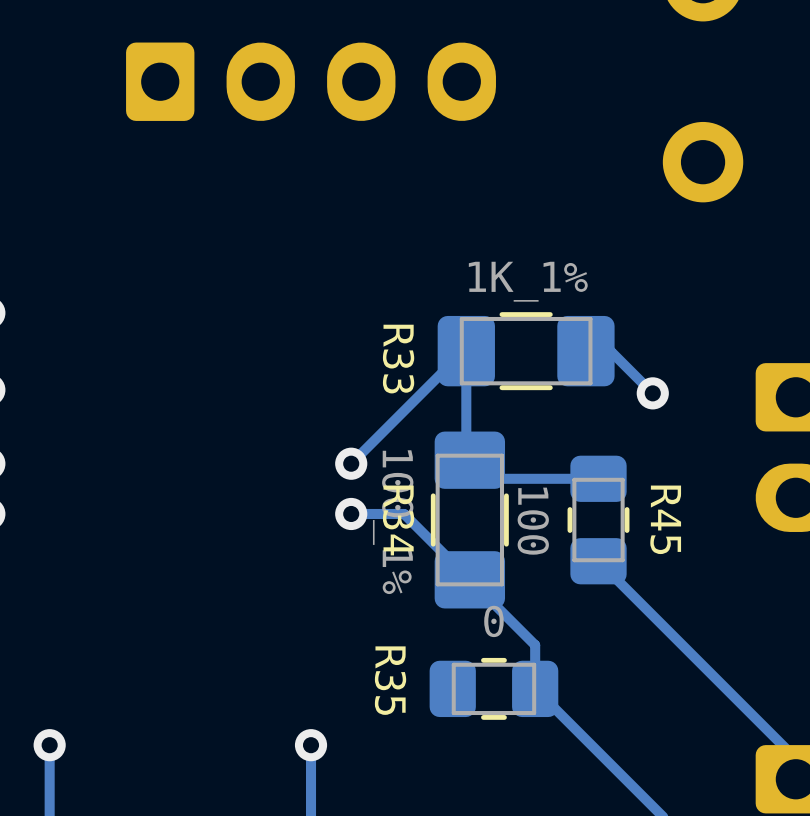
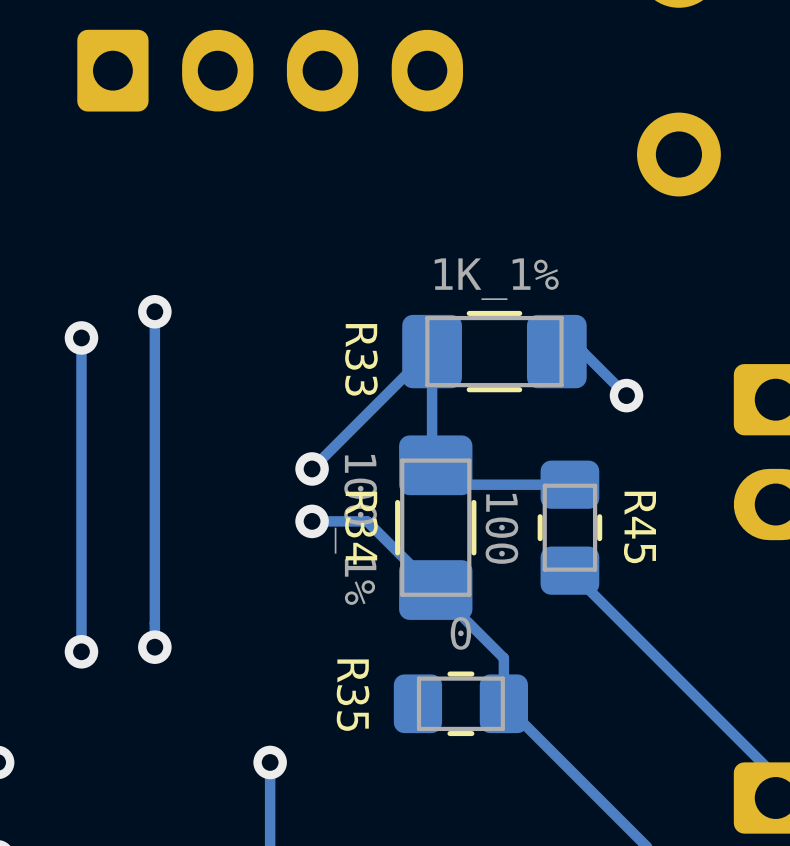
track: none -> (154, 311) (154, 647)
via: none -> (154, 311)
track: none -> (81, 337) (81, 651)
via: none -> (81, 337)
via: none -> (154, 647)
via: none -> (81, 651)

